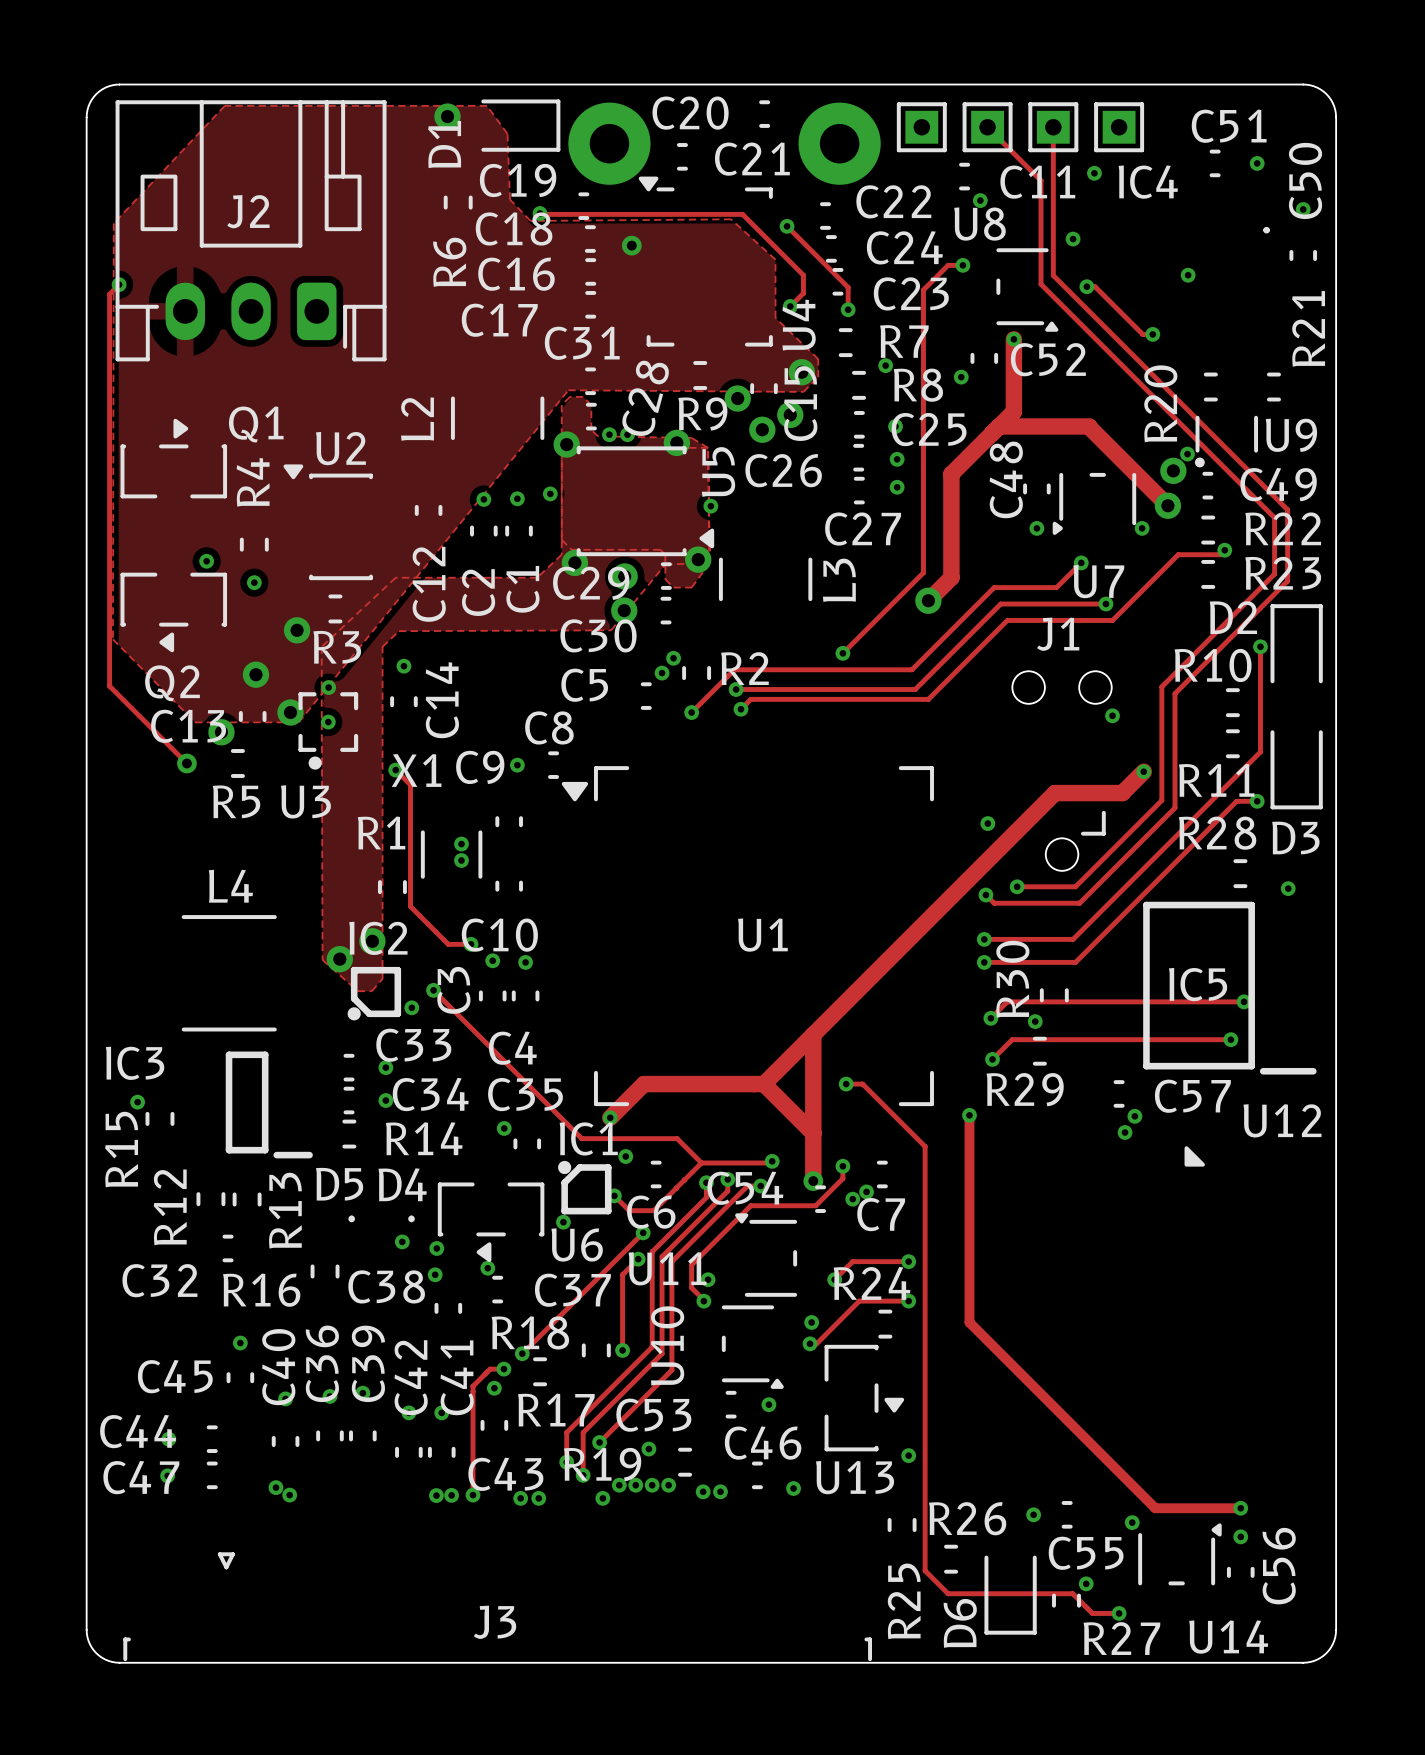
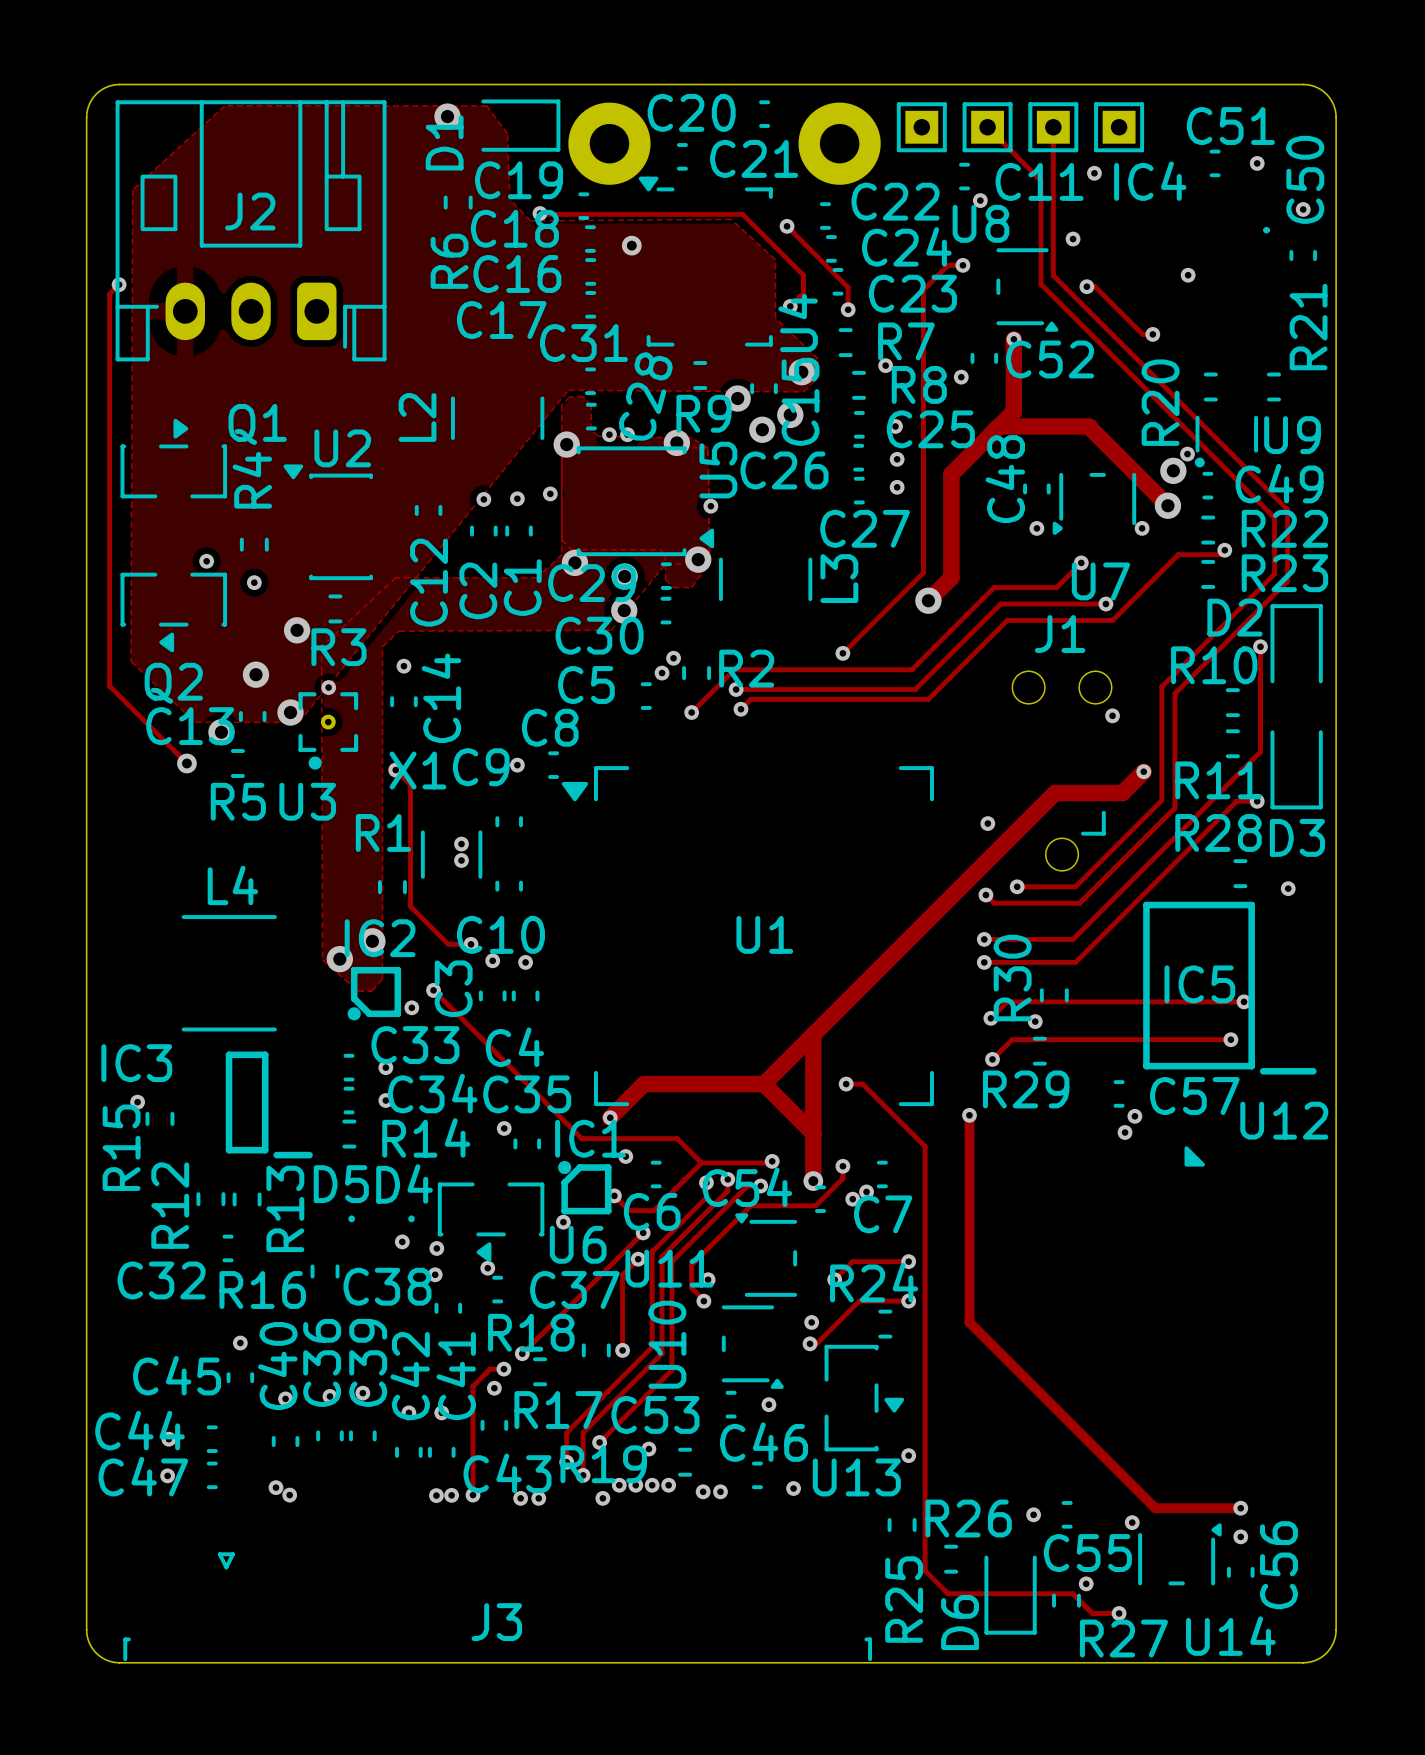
zone outline: (224, 105) (113, 223) (112, 639) (195, 722) -> (224, 105) (132, 189) (131, 661) (195, 722)

